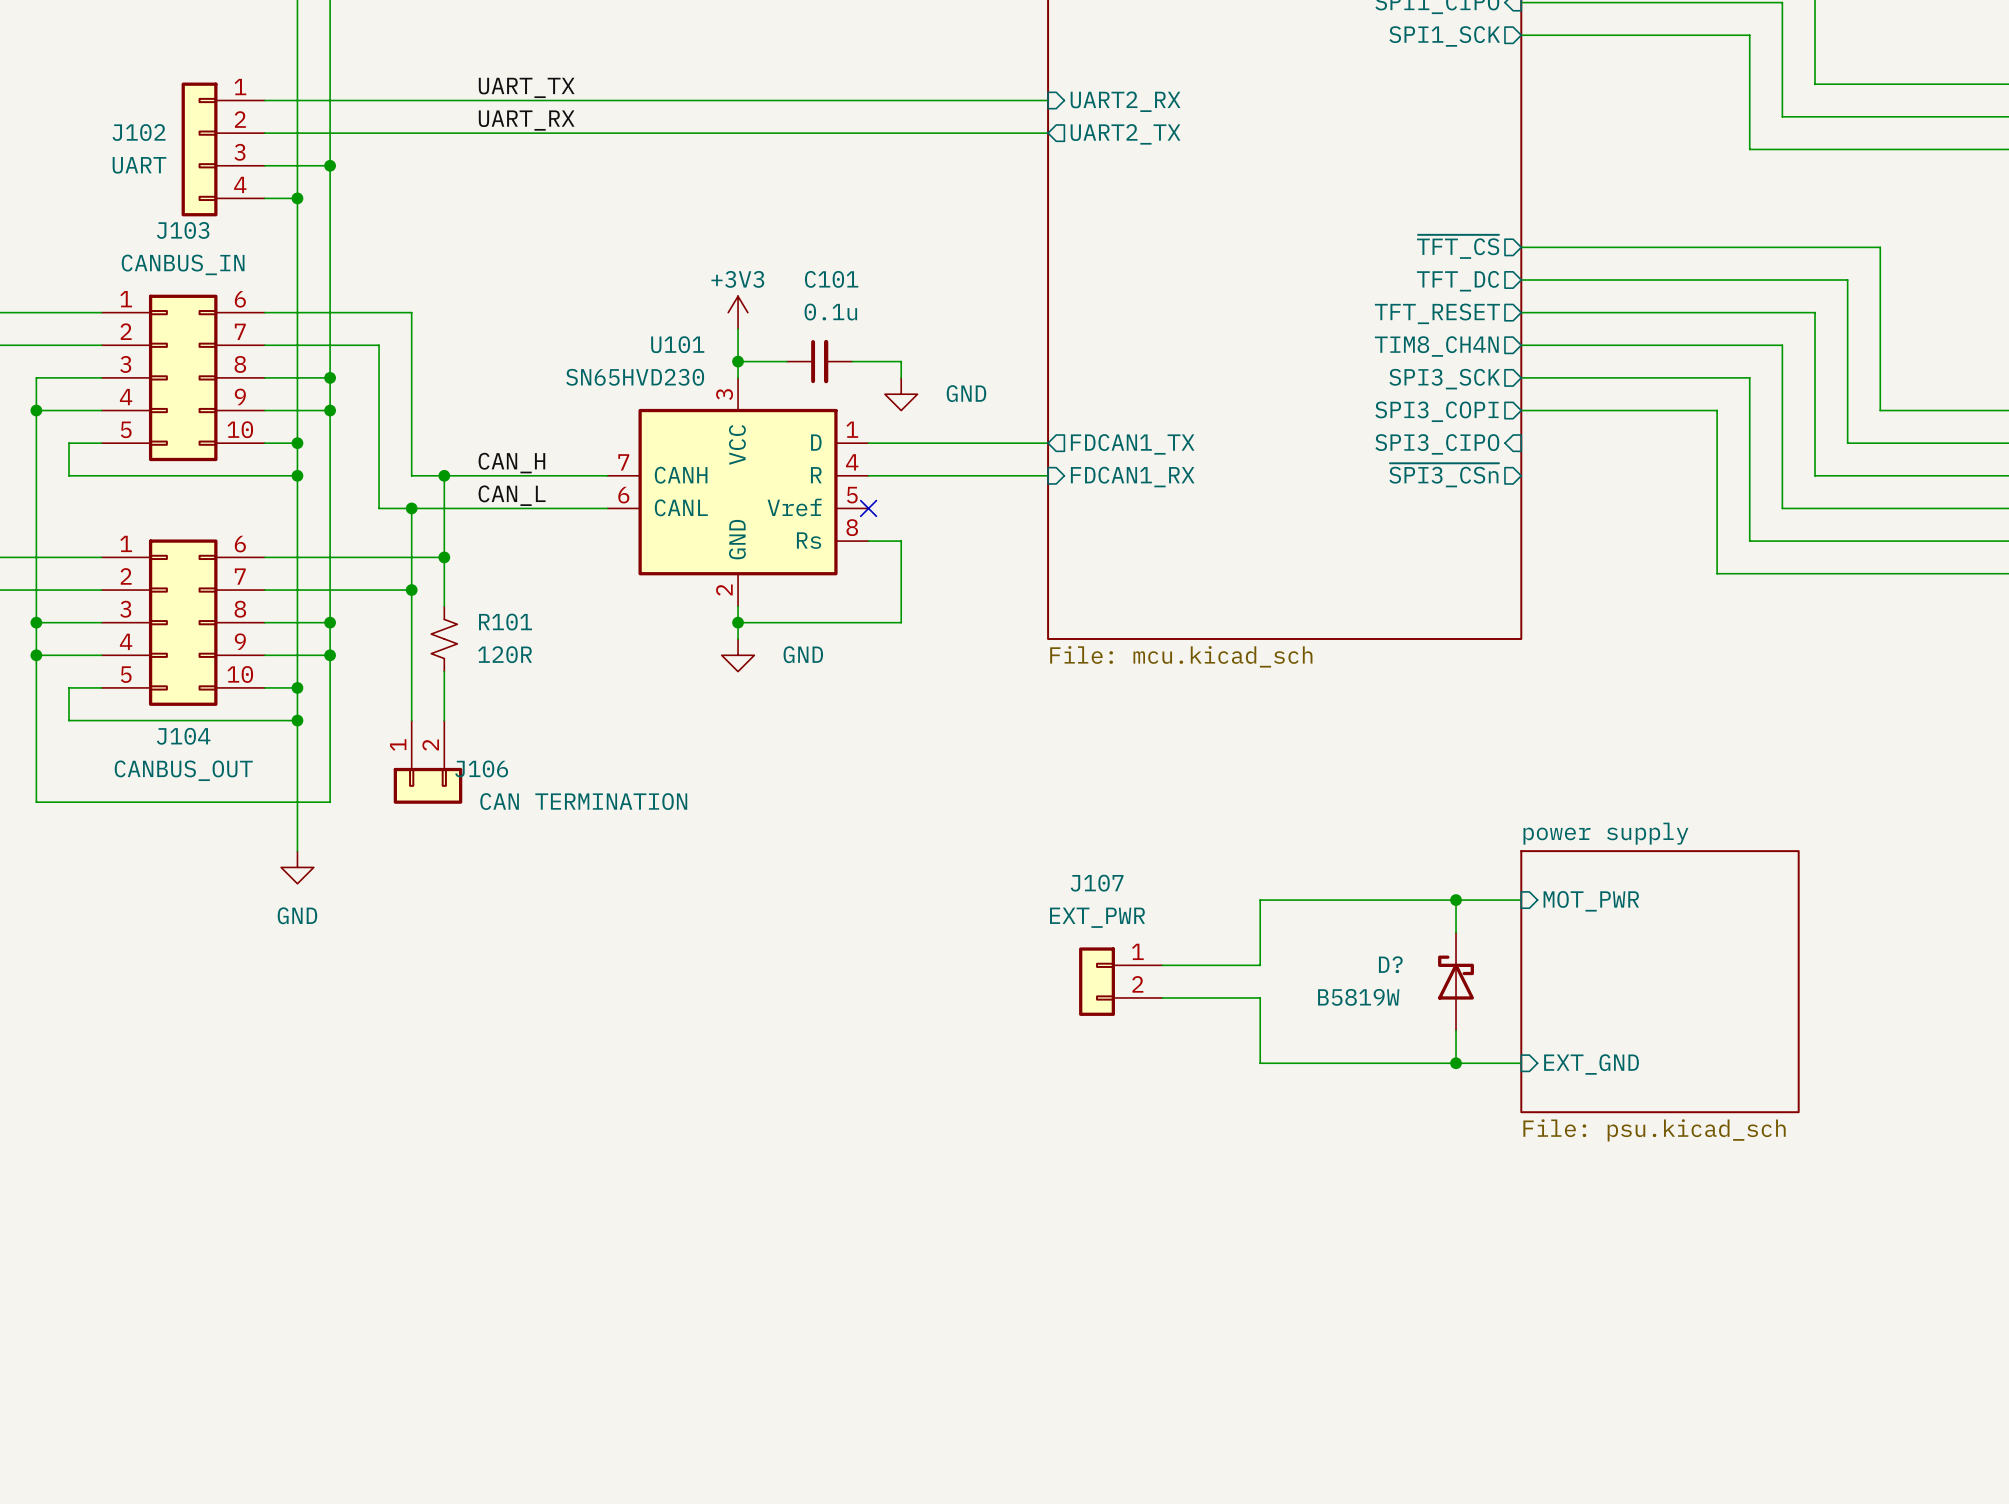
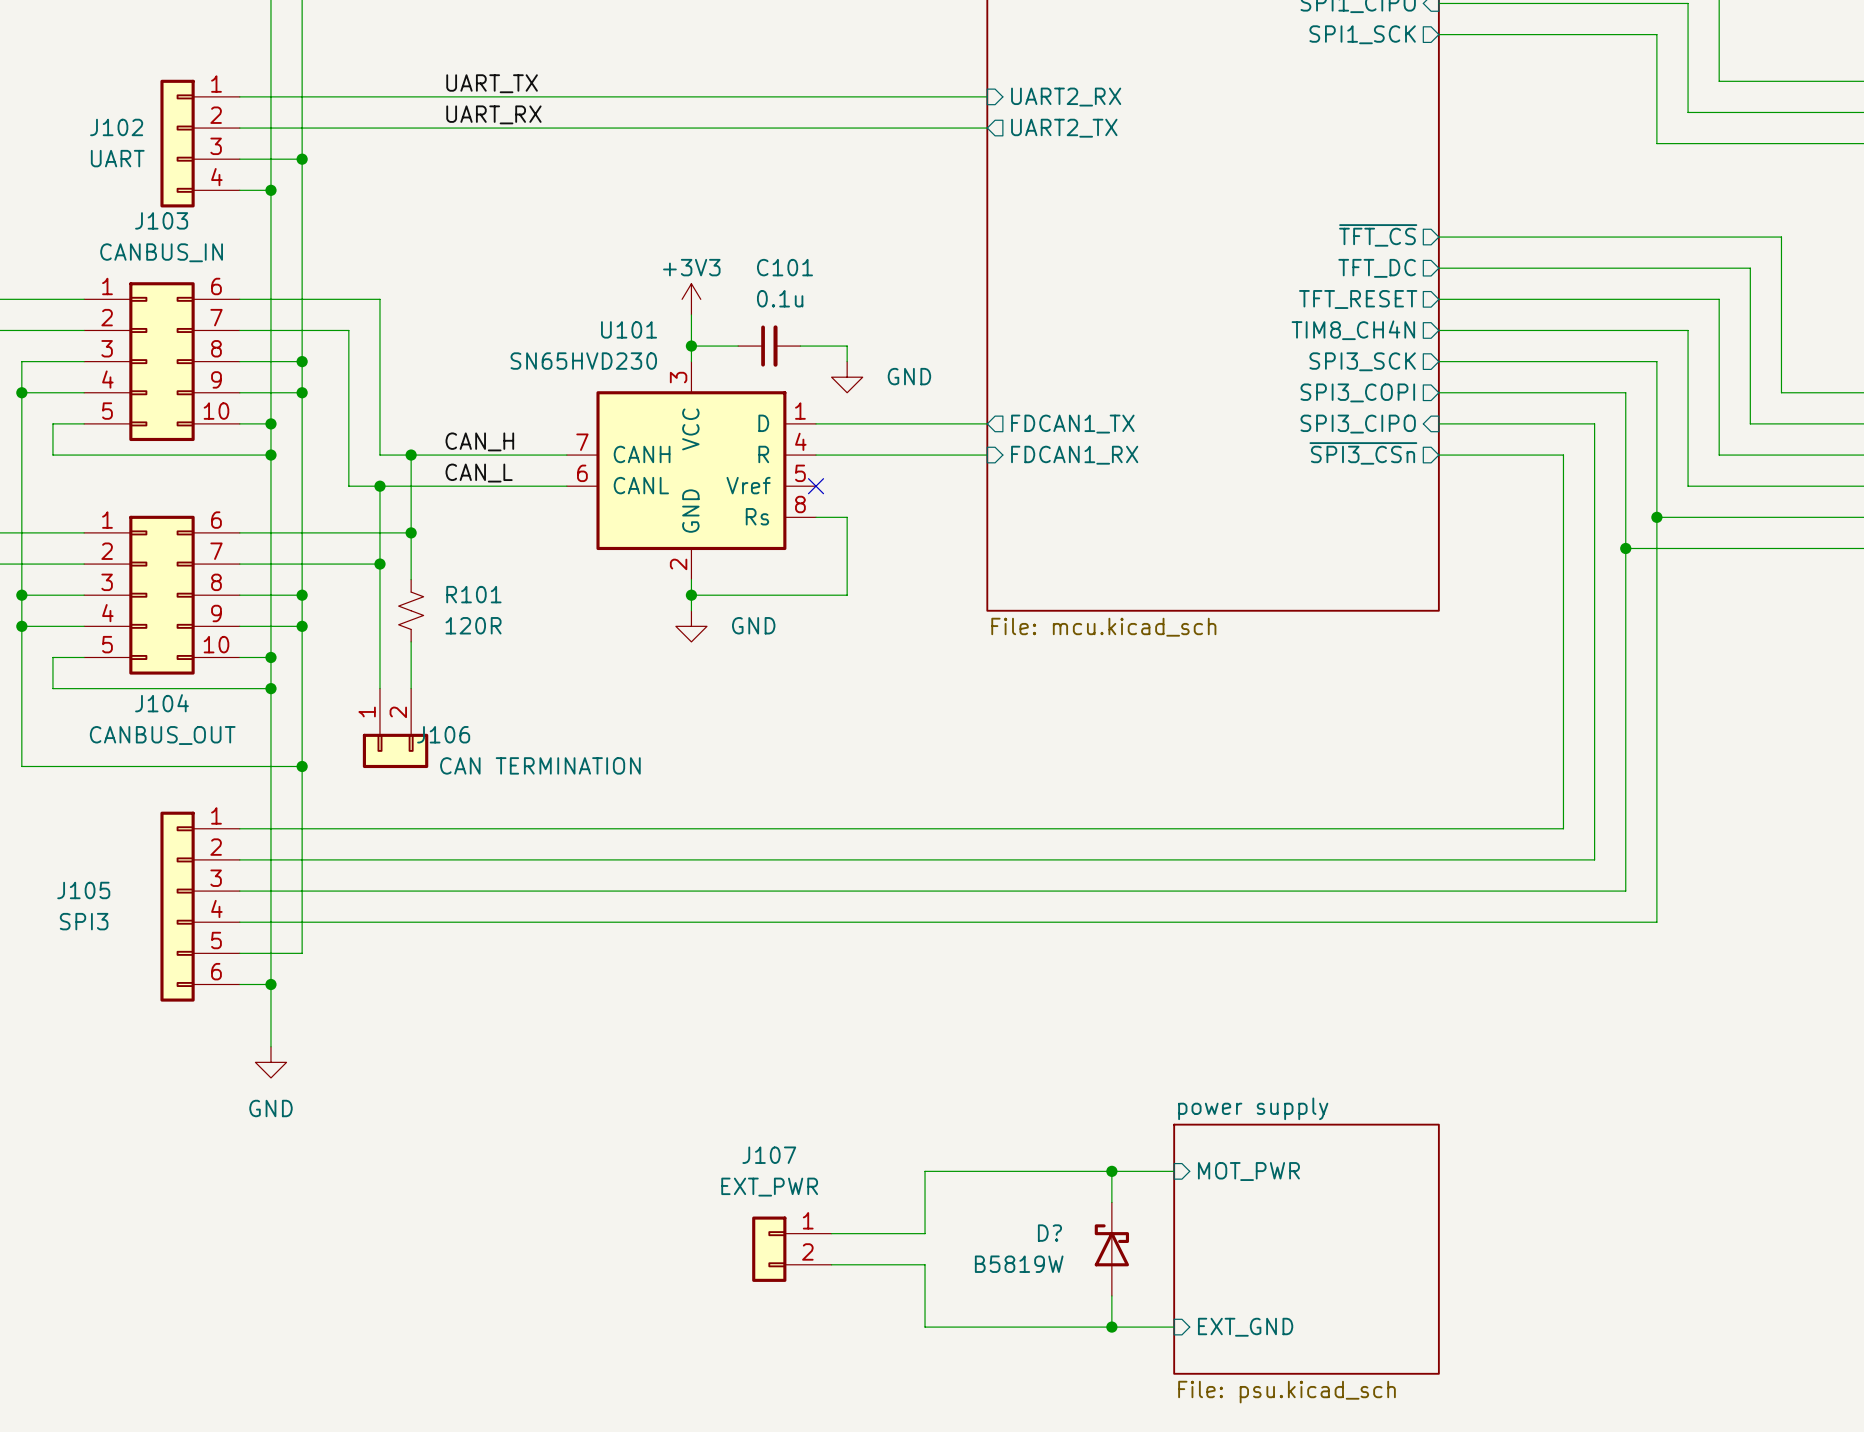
wire: none -> (1438, 423) (1594, 423) (1594, 859) (1438, 859)
wire: none -> (1438, 455) (1563, 455) (1563, 828) (239, 828)
junction: none -> (1656, 517)
wire: none -> (1625, 548) (1625, 891) (239, 891)
junction: none -> (1625, 548)
wire: none -> (302, 766) (302, 953) (239, 953)
junction: none -> (302, 766)
wire: none -> (270, 813) (270, 1046)
power symbol position: GND (297, 867) -> GND (270, 1062)
wire: none -> (239, 859) (1189, 859)
wire: (1260, 900) (1260, 965) -> (1656, 517) (1656, 922) (1189, 922)
wire: (1456, 900) (1456, 932) -> none
junction: (1456, 900) -> none
sheet pin: MOT_PWR (1591, 901) -> none
J105: none -> SPI3 (200, 906)
wire: none -> (239, 922) (1096, 922)
J107 position: (1120, 981) -> (791, 1249)
D?: B5819W (1456, 981) -> none
sheet power supply: File: psu.kicad_sch (1659, 981) -> none
wire: (1162, 997) (1260, 997) (1260, 1063) (1521, 1063) -> none
wire: none -> (239, 984) (270, 984)
junction: none -> (270, 984)
wire: (1456, 1030) (1456, 1063) -> none
junction: (1456, 1063) -> none
sheet pin: EXT_GND (1591, 1064) -> none
wire: none -> (1111, 1171) (1111, 1202)
junction: none -> (1111, 1171)
wire: none -> (1174, 1171) (925, 1171) (925, 1233) (831, 1233)
sheet pin: none -> MOT_PWR (1248, 1171)
D?: none -> B5819W (1111, 1249)
sheet power supply: none -> File: psu.kicad_sch (1306, 1249)
wire: none -> (831, 1264) (925, 1264) (925, 1327) (1174, 1327)
wire: none -> (1111, 1295) (1111, 1327)
junction: none -> (1111, 1327)
sheet pin: none -> EXT_GND (1245, 1327)

